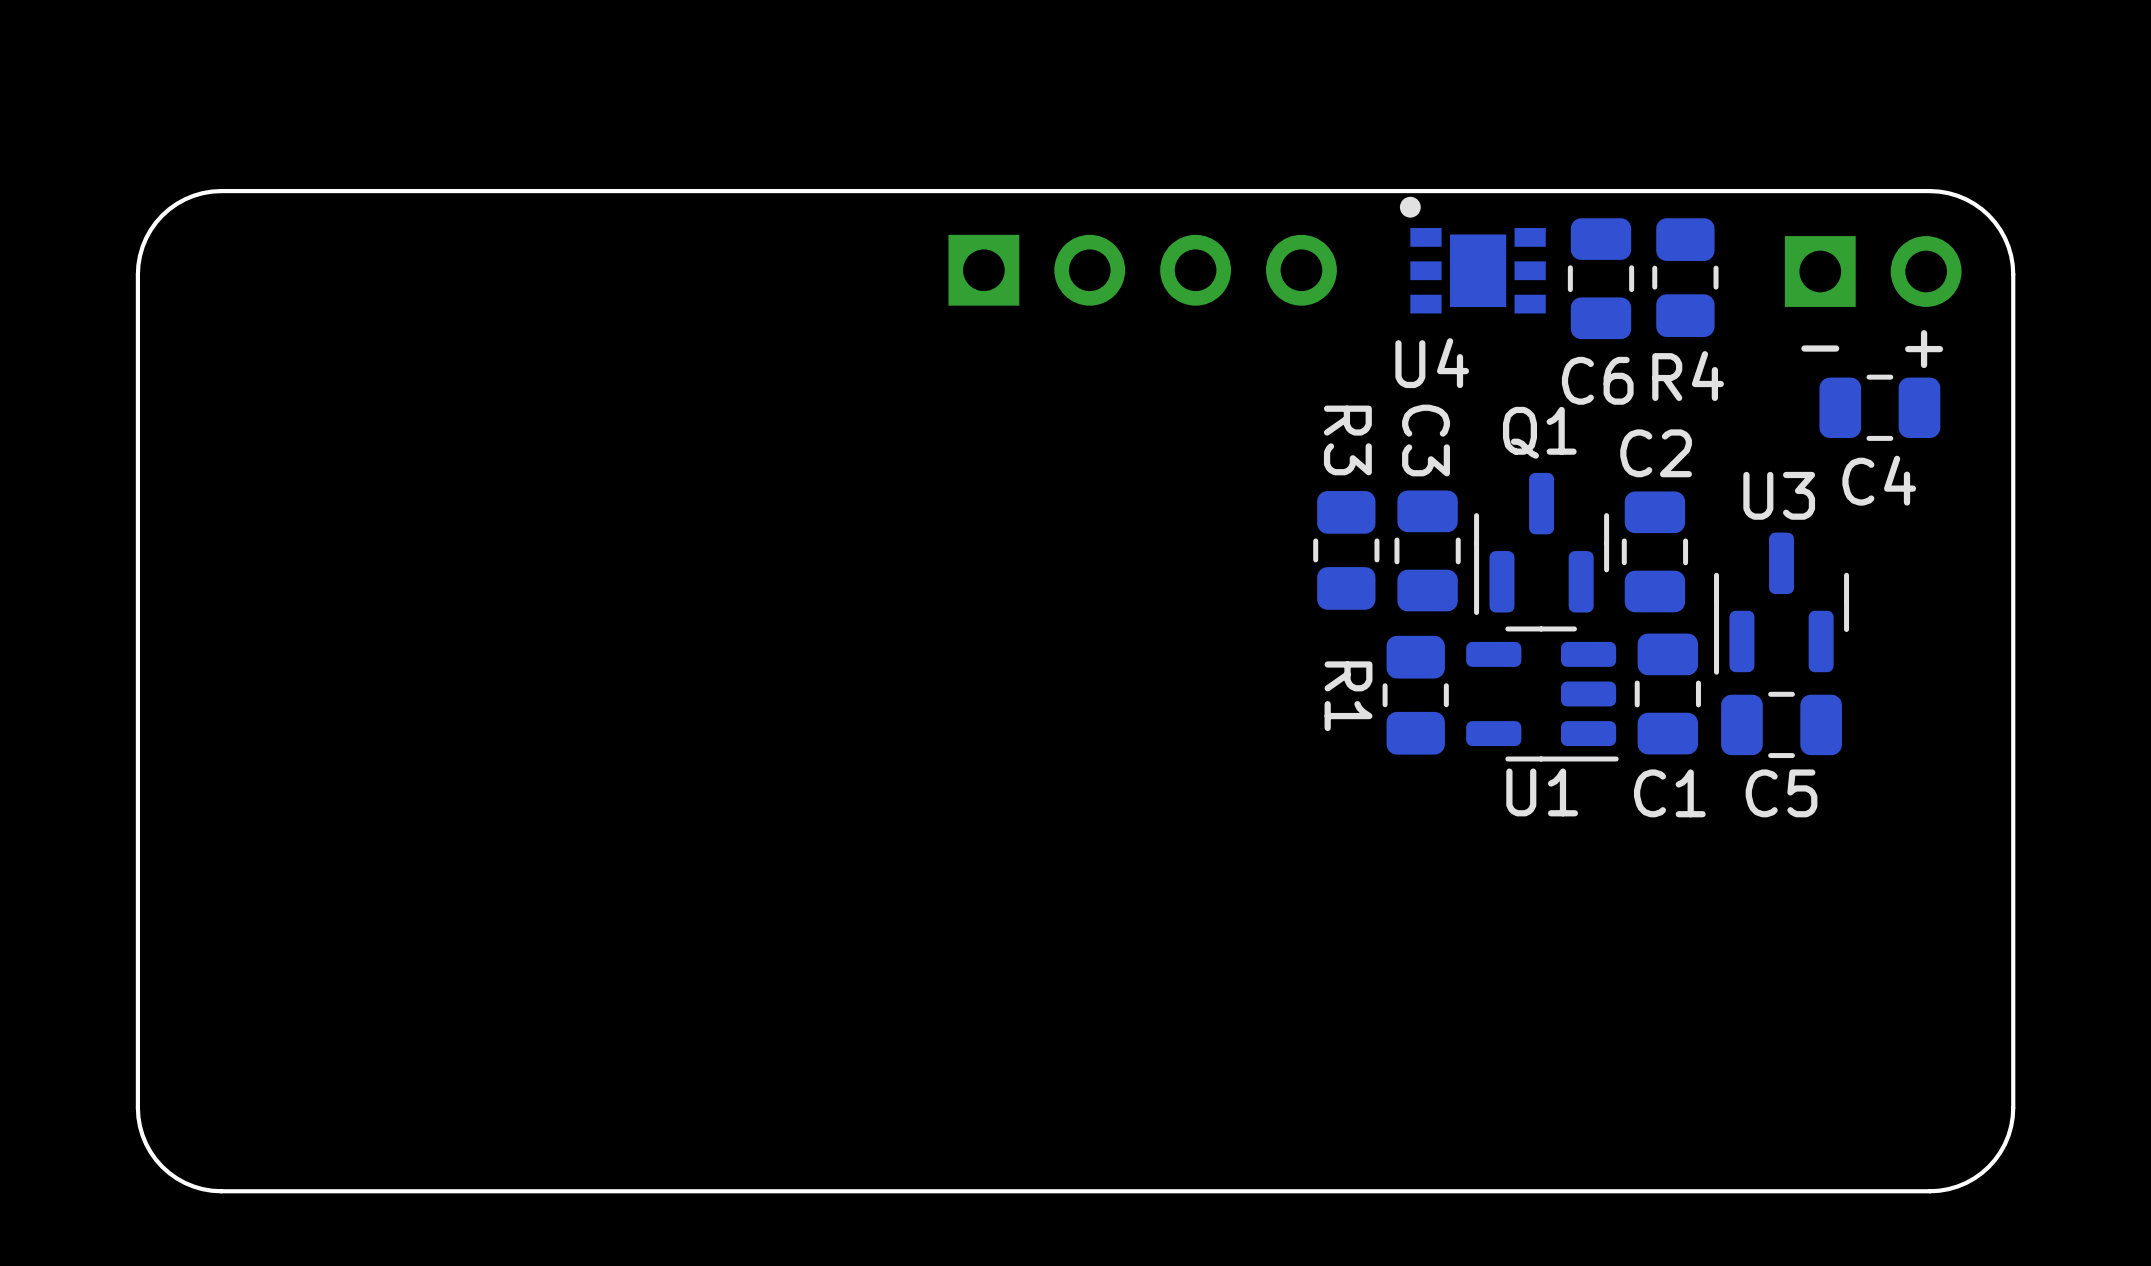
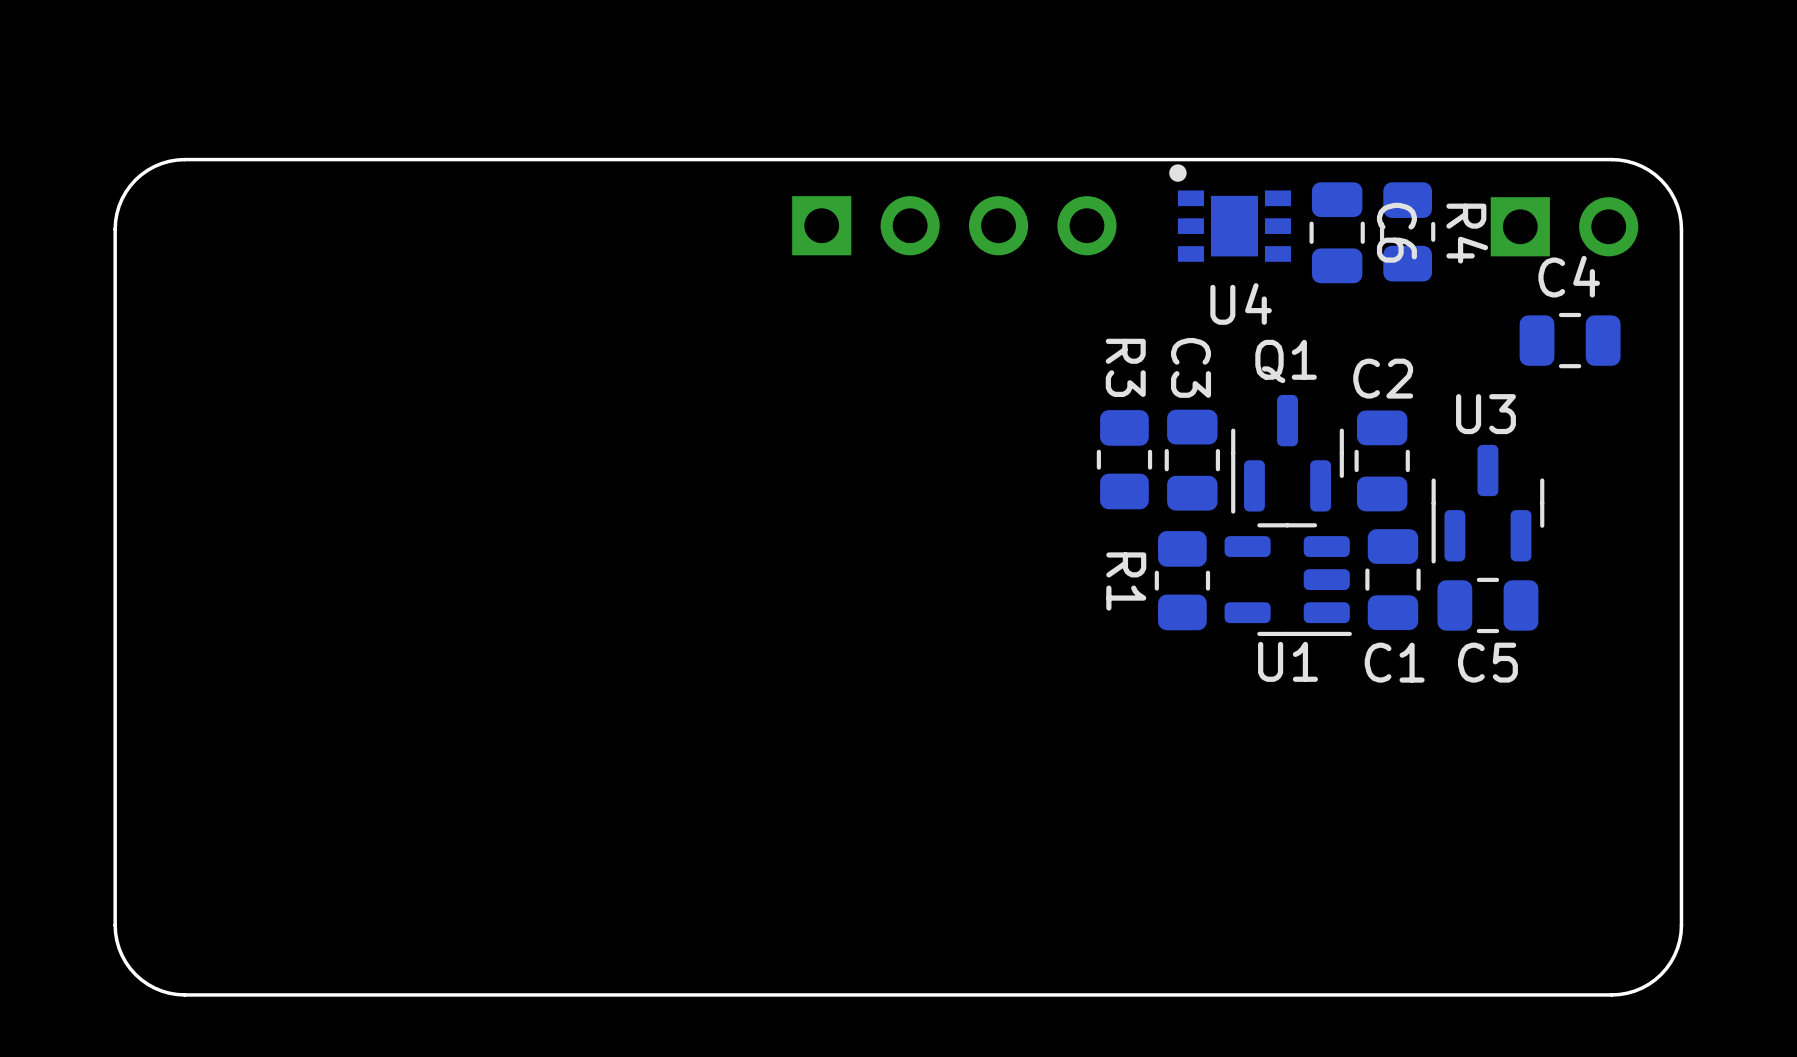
text: - (1820, 348) -> none
text: + (1924, 349) -> none
U4 name position: U4 (1432, 363) -> U4 (1241, 303)
R4 name rotation: 0° (1688, 376) -> 90° clockwise (1467, 233)
R4 name position: R4 (1688, 376) -> R4 (1467, 233)
C6 name rotation: 0° (1597, 380) -> 90° clockwise (1396, 232)
C6 name position: C6 (1597, 380) -> C6 (1396, 232)
C4 name position: C4 (1879, 480) -> C4 (1569, 276)

